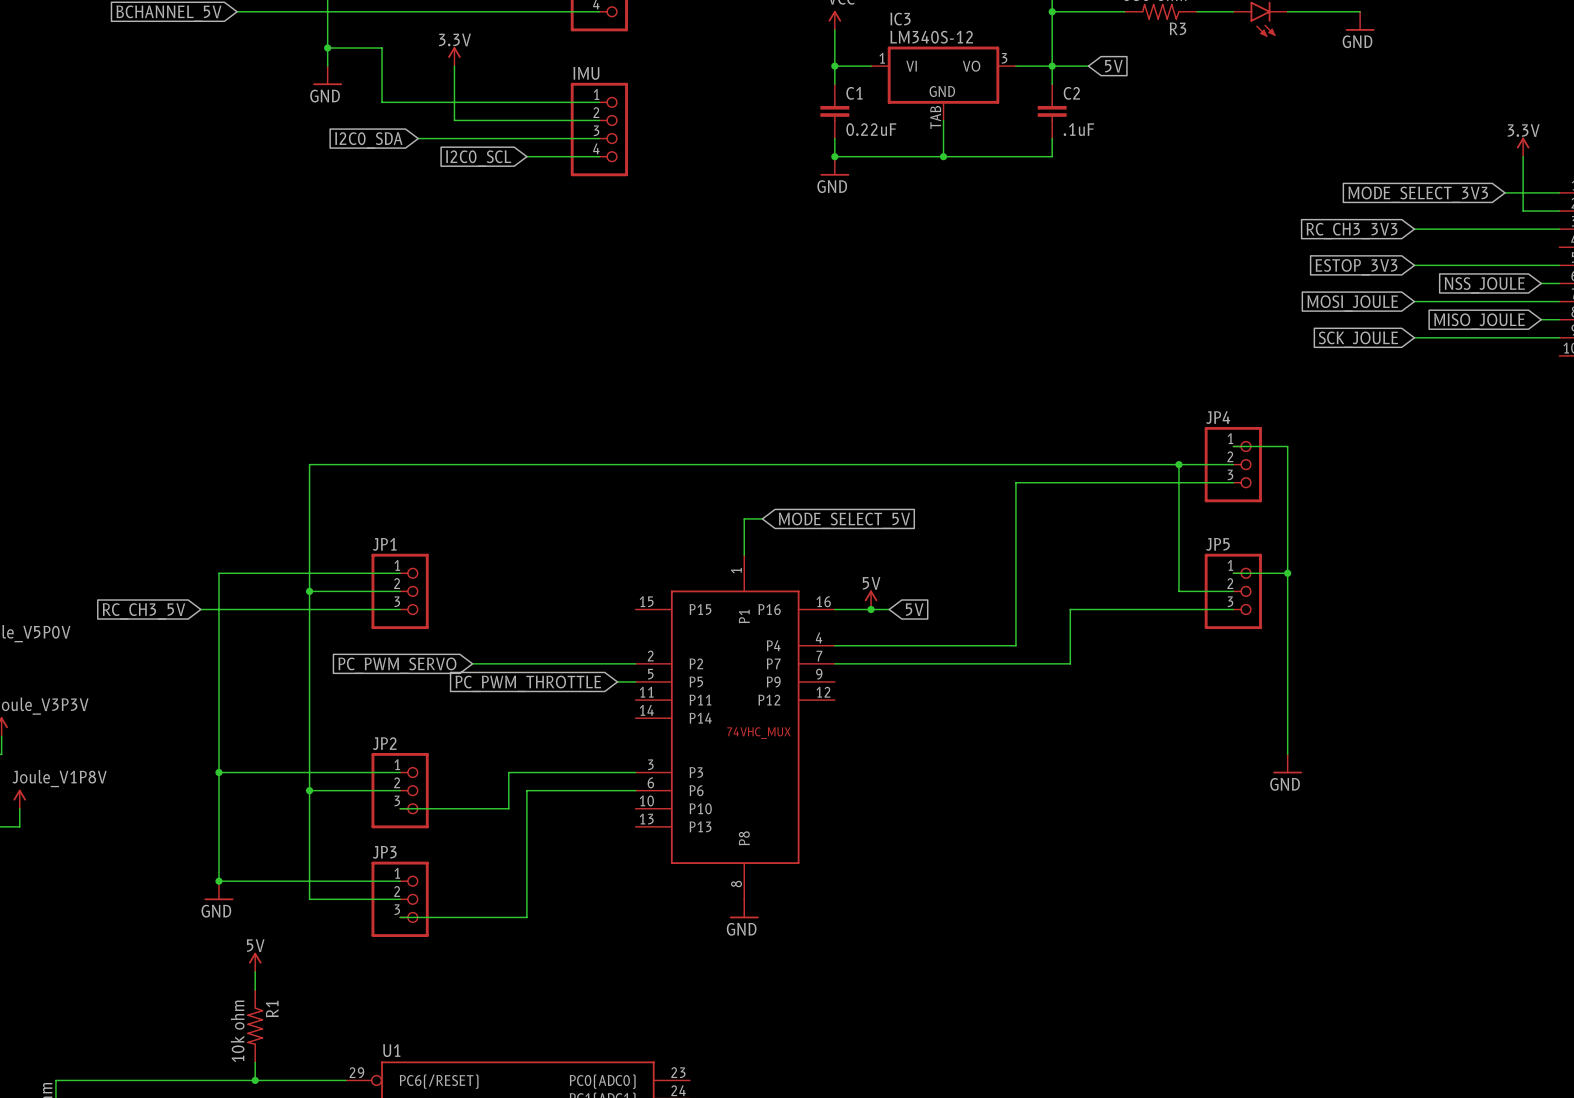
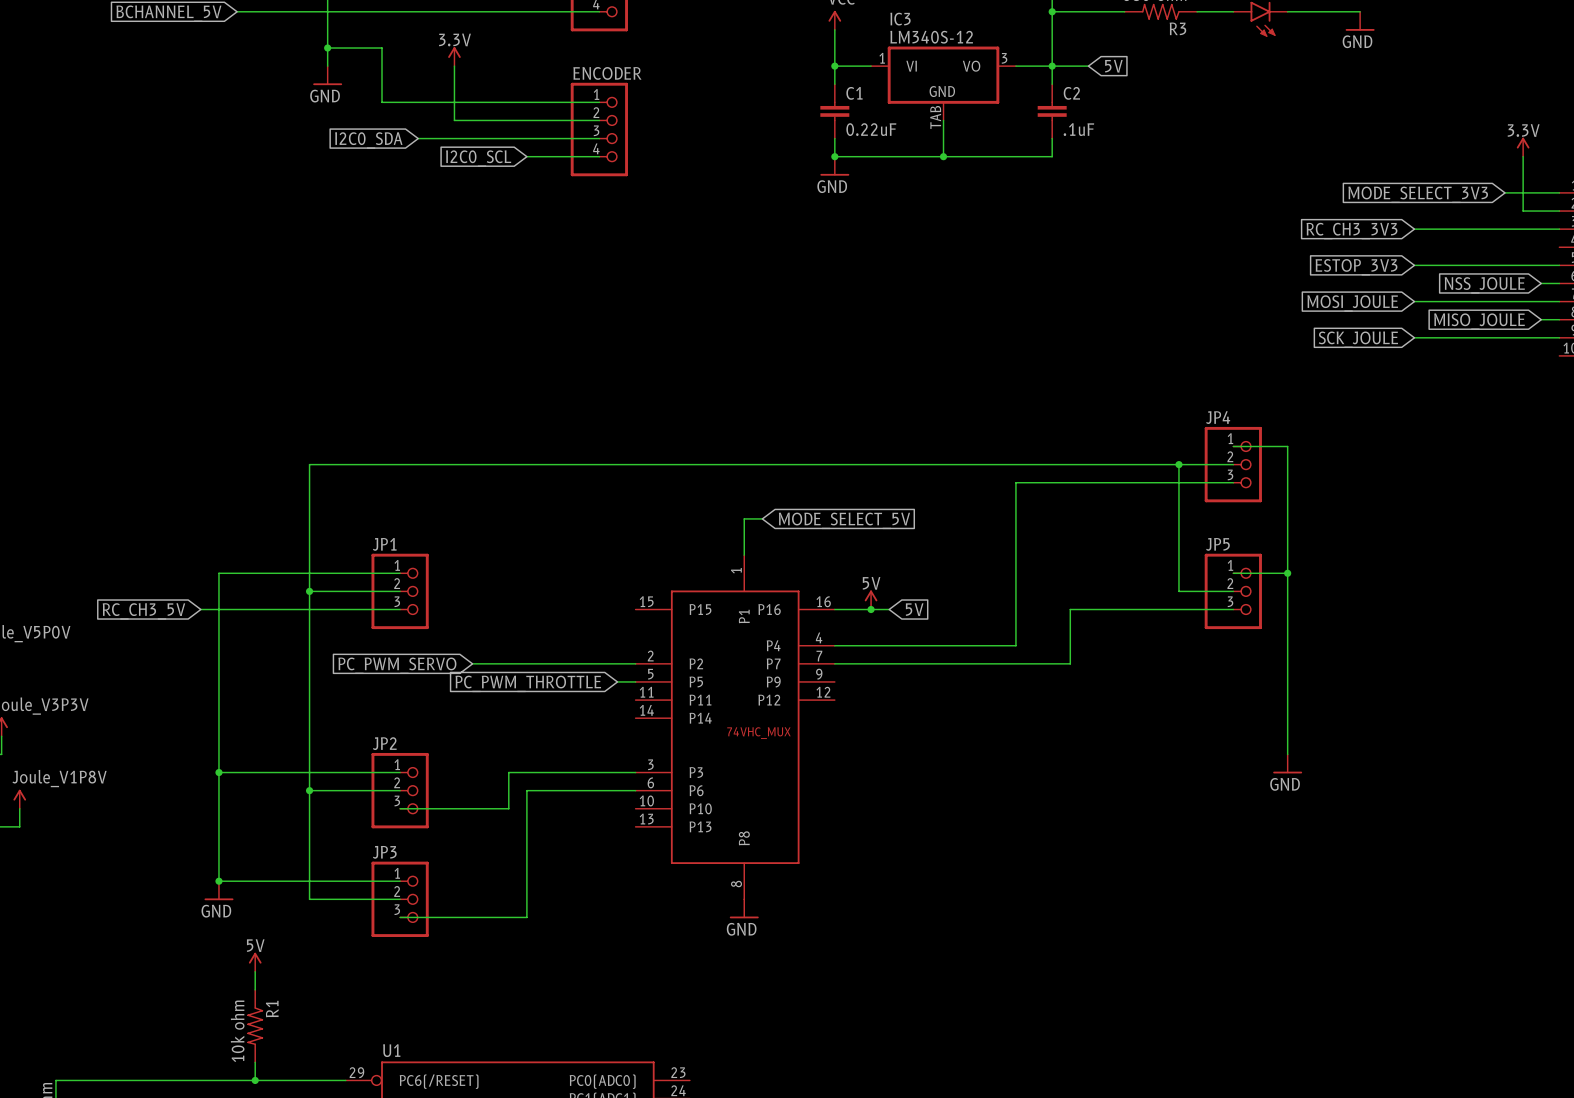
IMU name: IMU (586, 73) -> ENCODER (607, 73)

